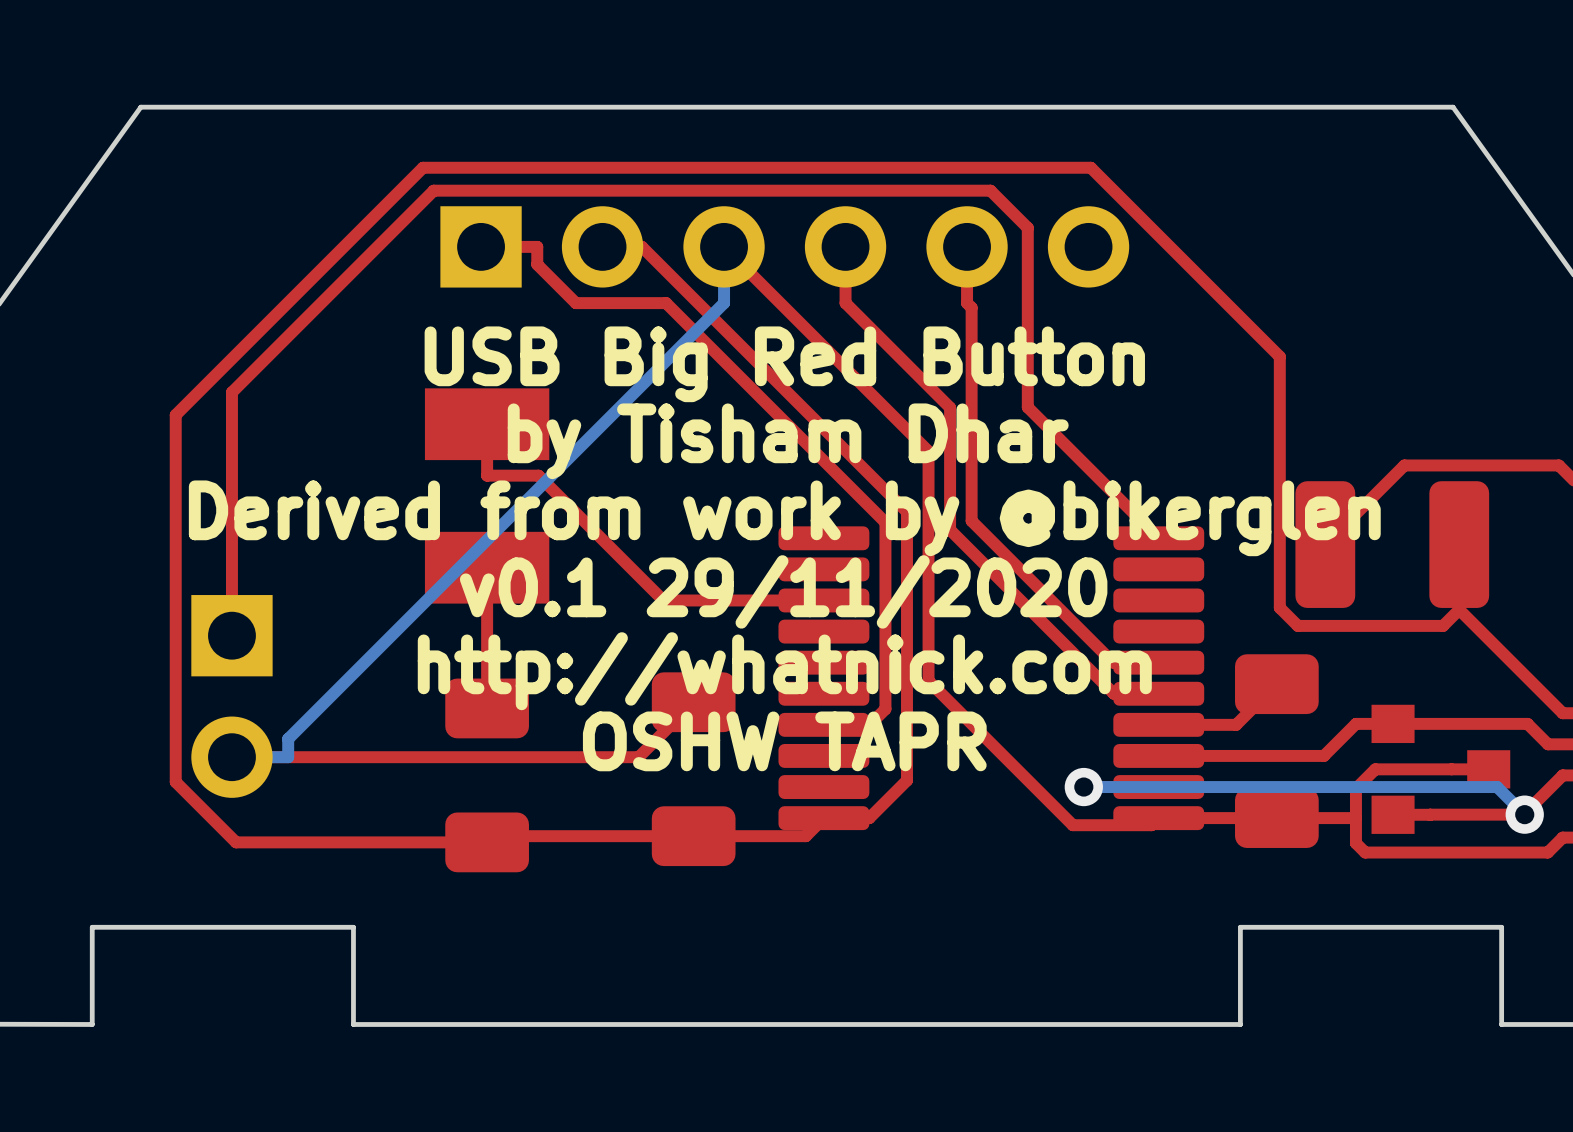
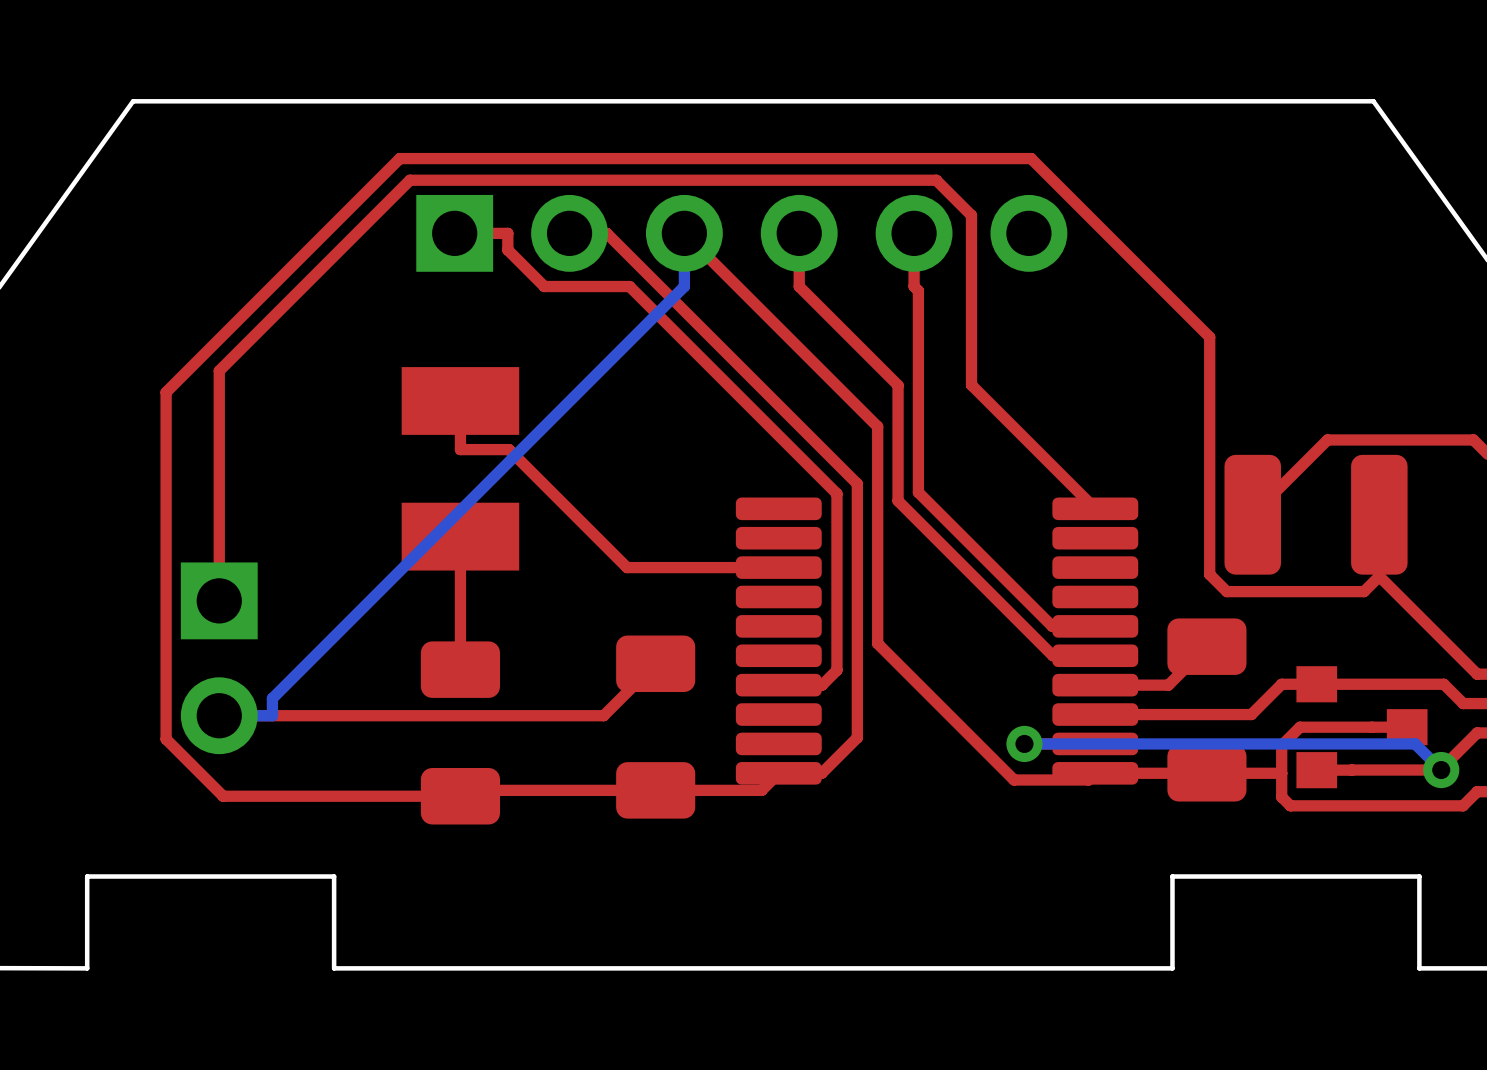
text: USB Big Red Button (784, 364) -> none
text: by Tisham Dhar (788, 441) -> none
text: Derived from work by @bikerglen (784, 518) -> none
text: v0.1 29/11/2020 (783, 591) -> none
text: http://whatnick.com (784, 671) -> none
text: OSHW TAPR (784, 741) -> none

